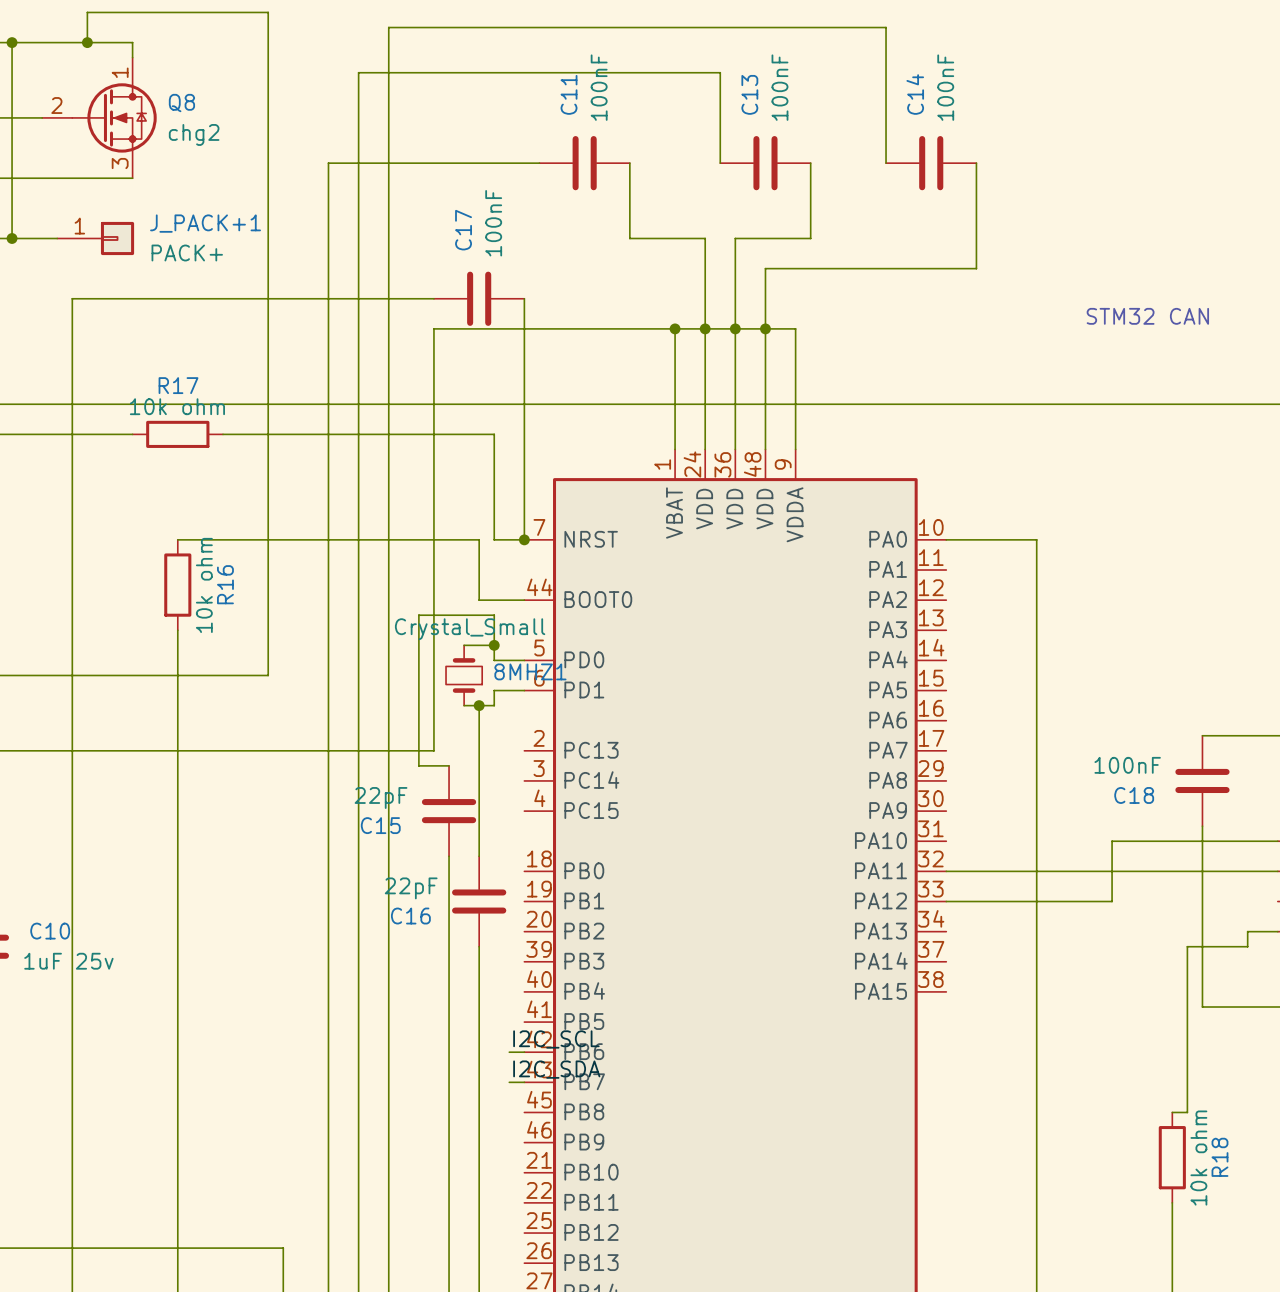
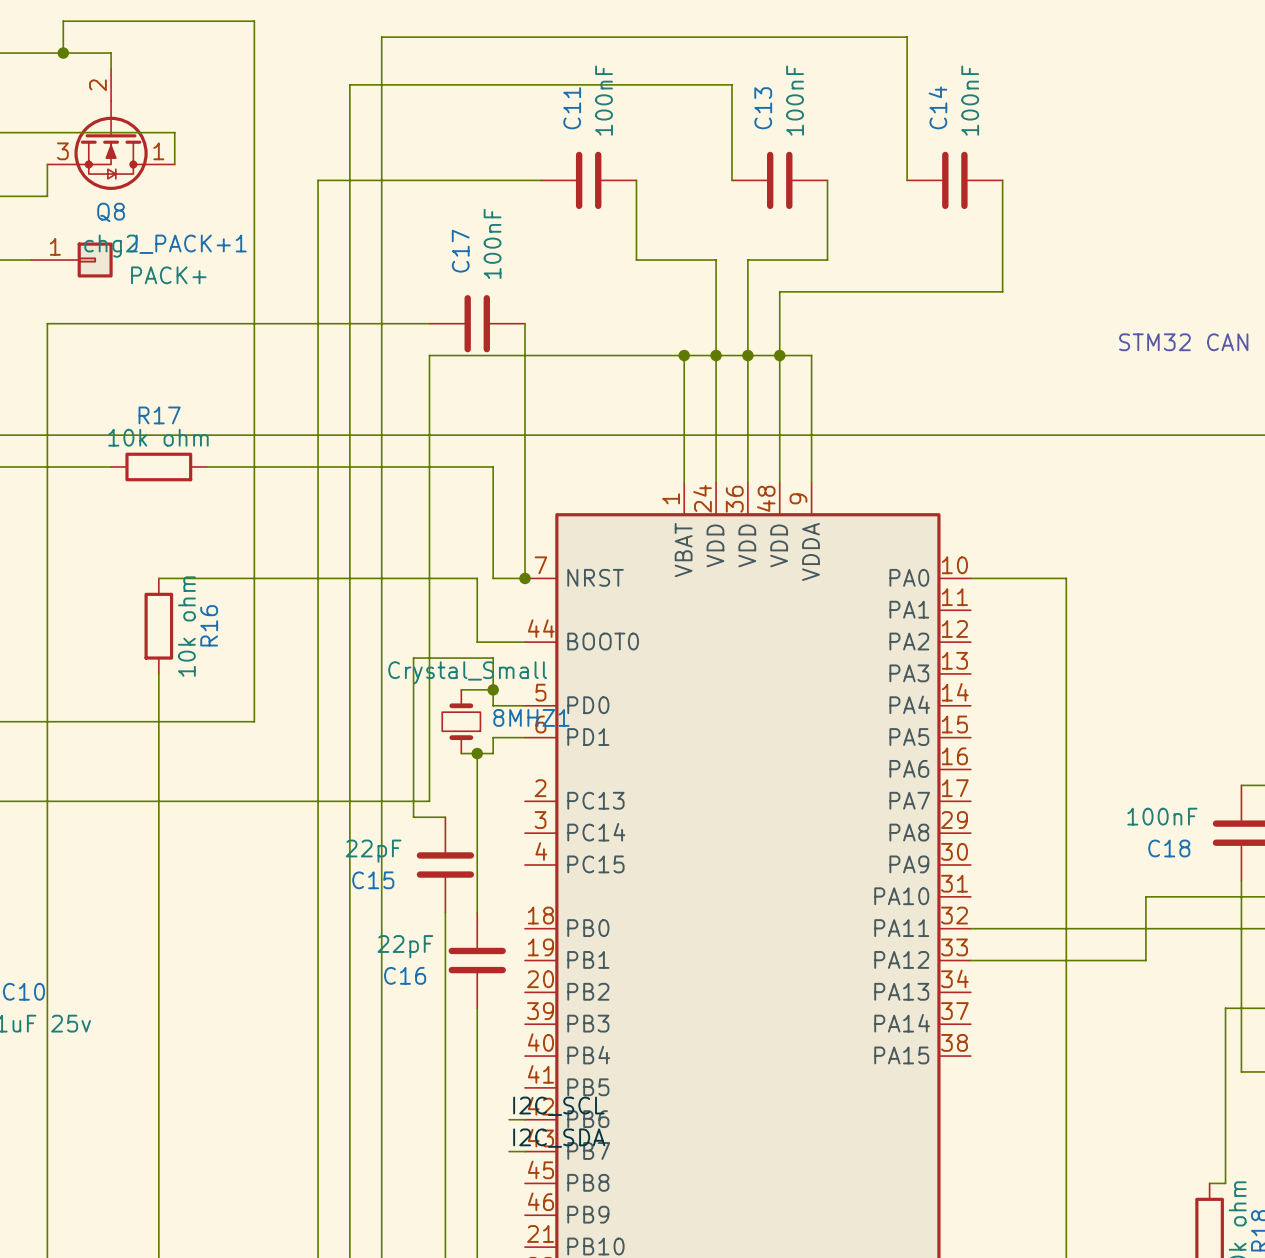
wire: none -> (15, 132) (174, 132) (174, 164)
Q8 rotation: 0° (114, 117) -> 90° clockwise (111, 145)
wire: (72, 178) (132, 178) -> (47, 196) (47, 164)

